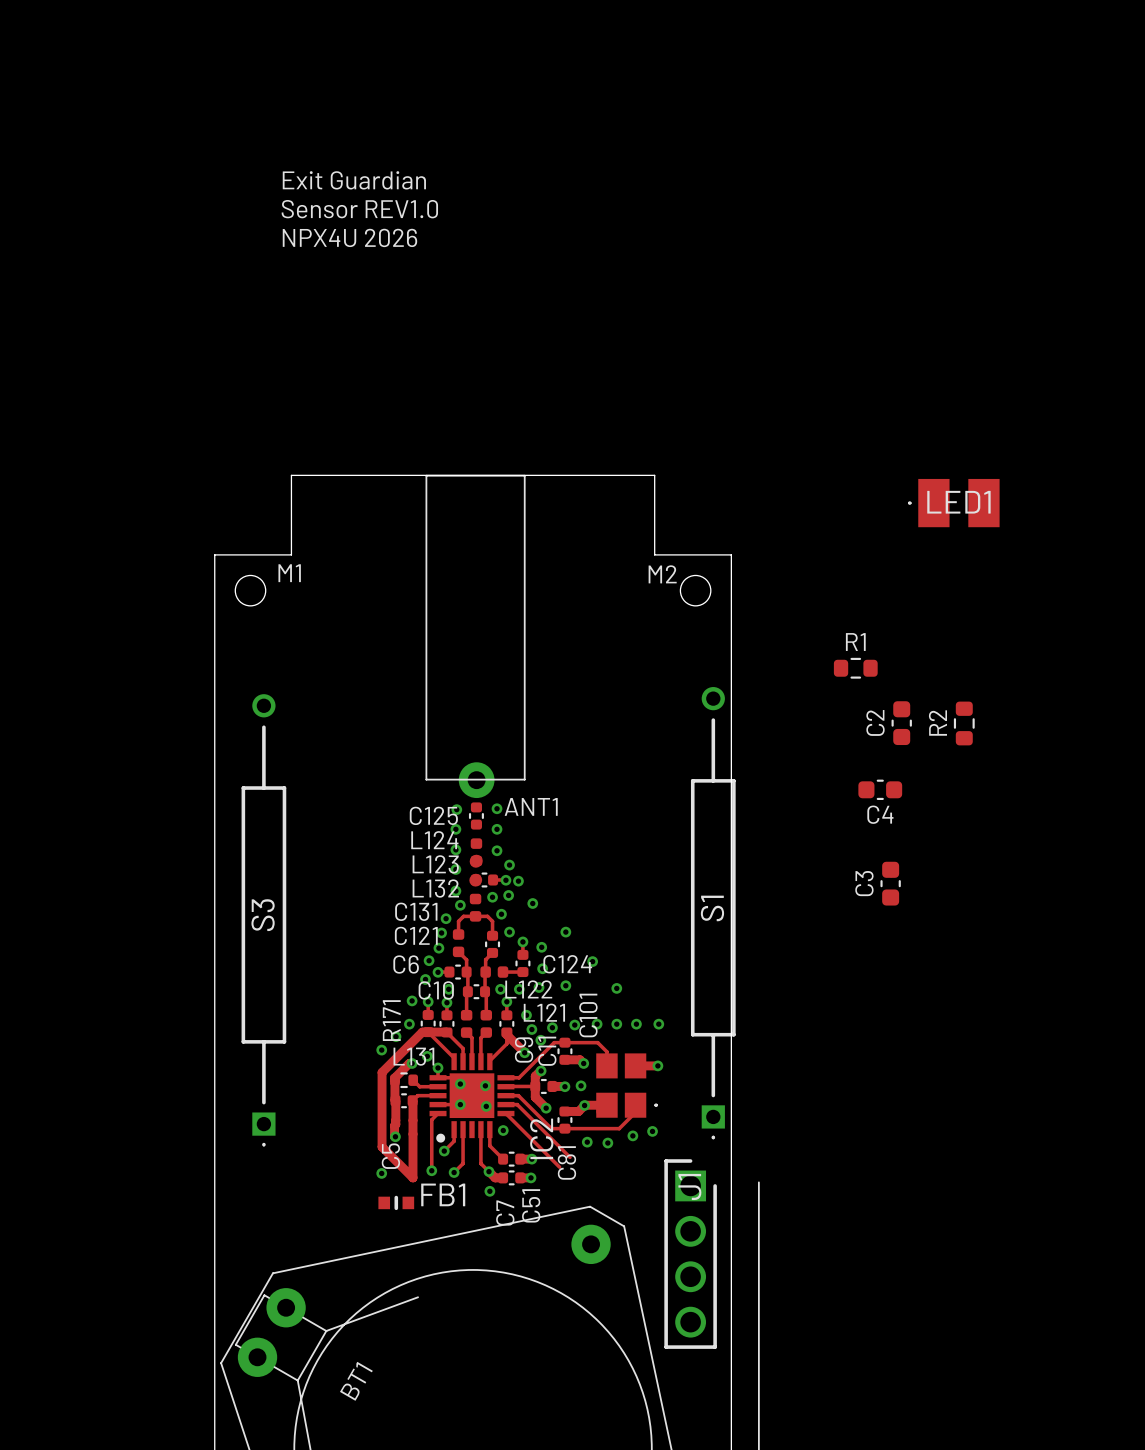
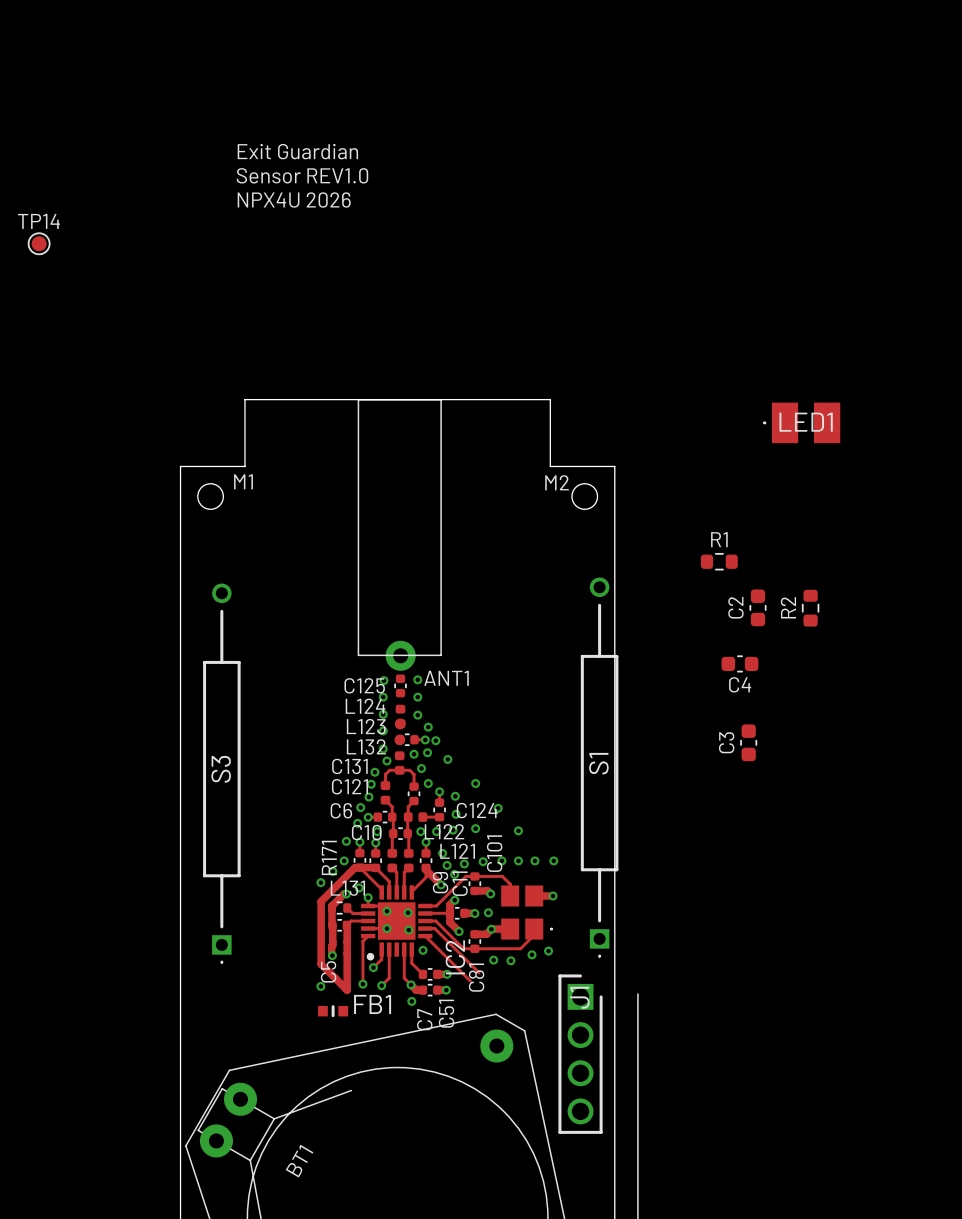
TP14: none -> (39, 243)

